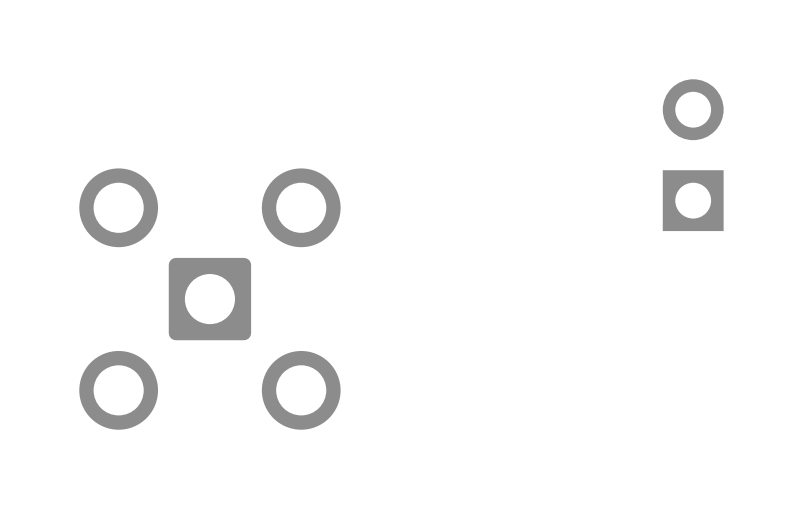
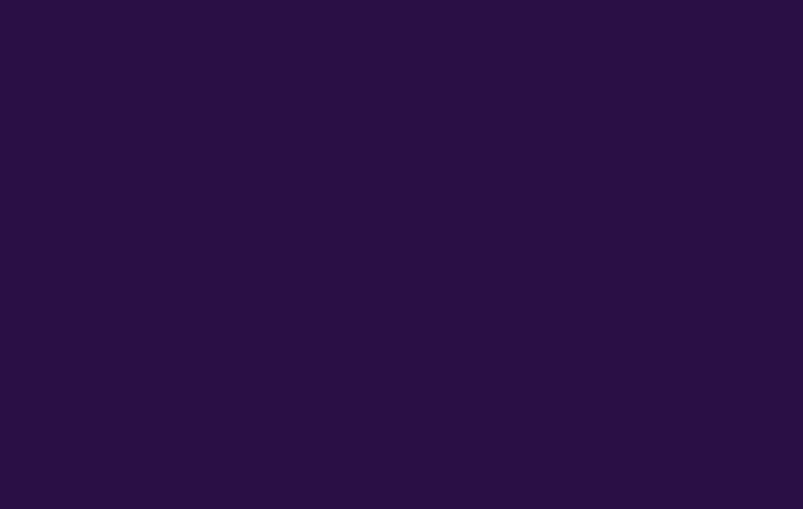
part: (693, 155) -> none
part: (209, 299) -> none

